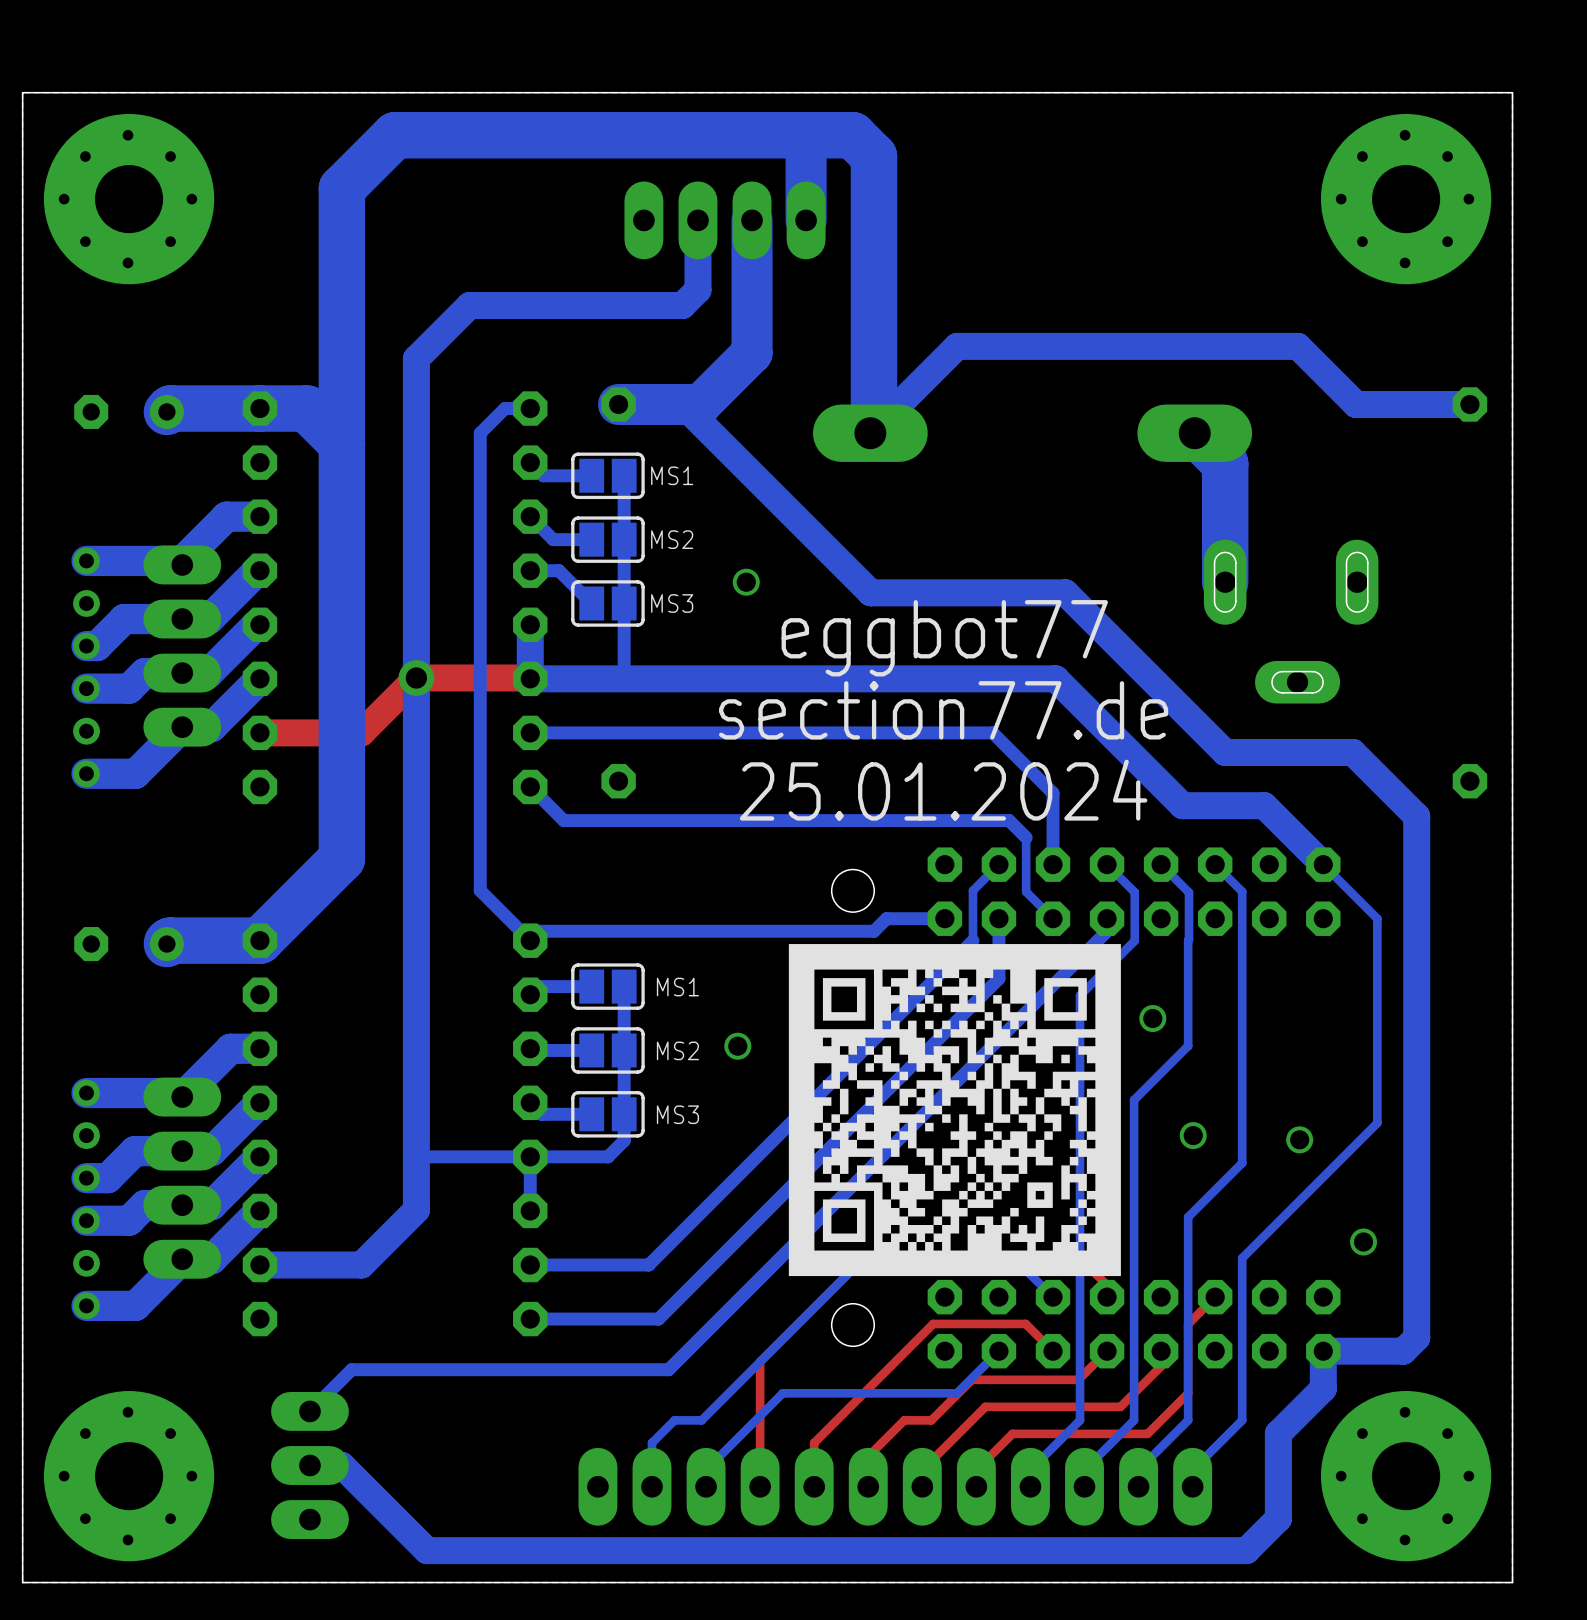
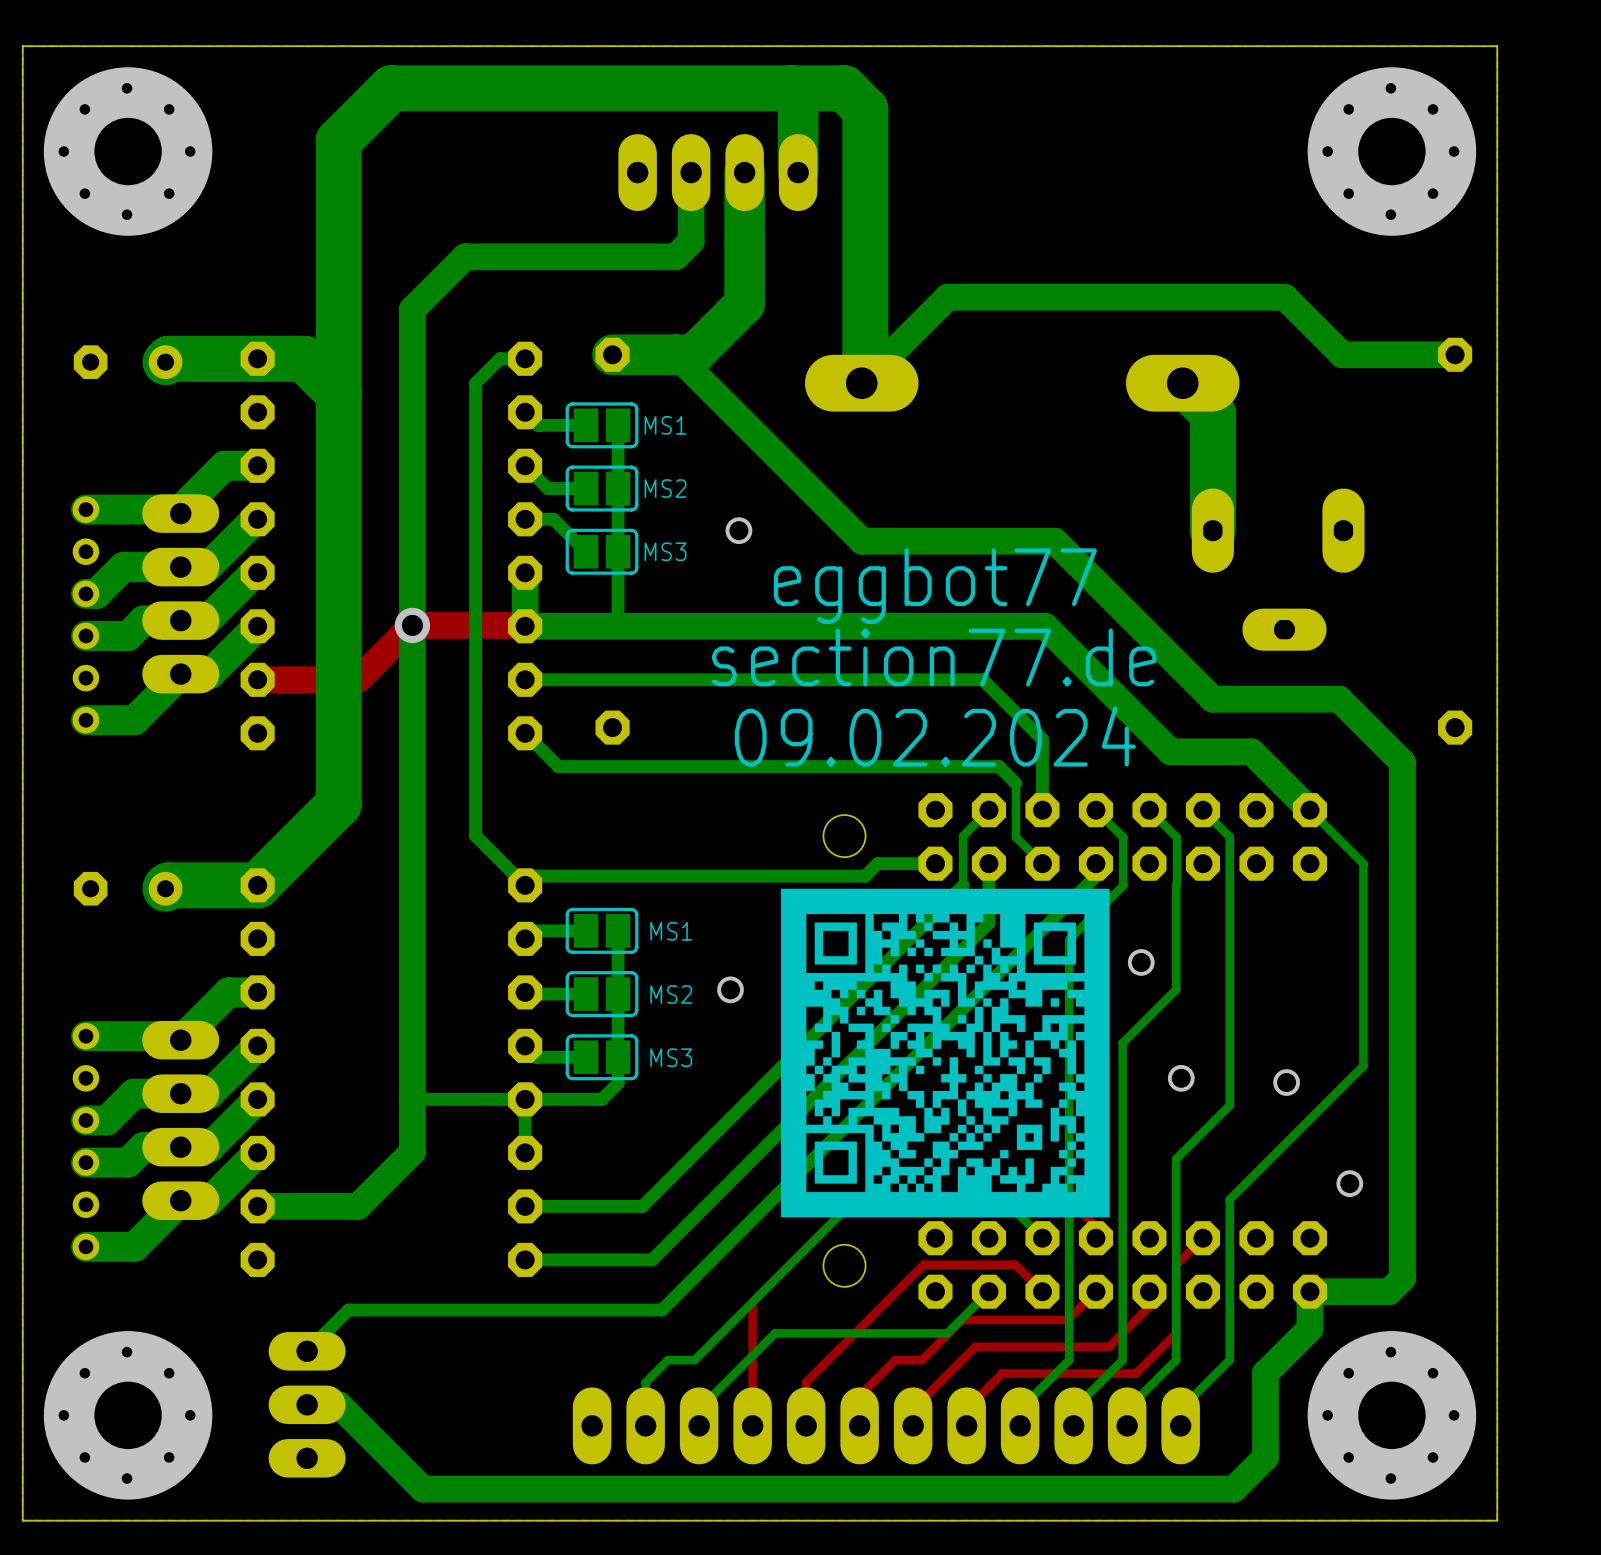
text: 25.01.2024 (943, 790) -> 09.02.2024 (935, 736)

